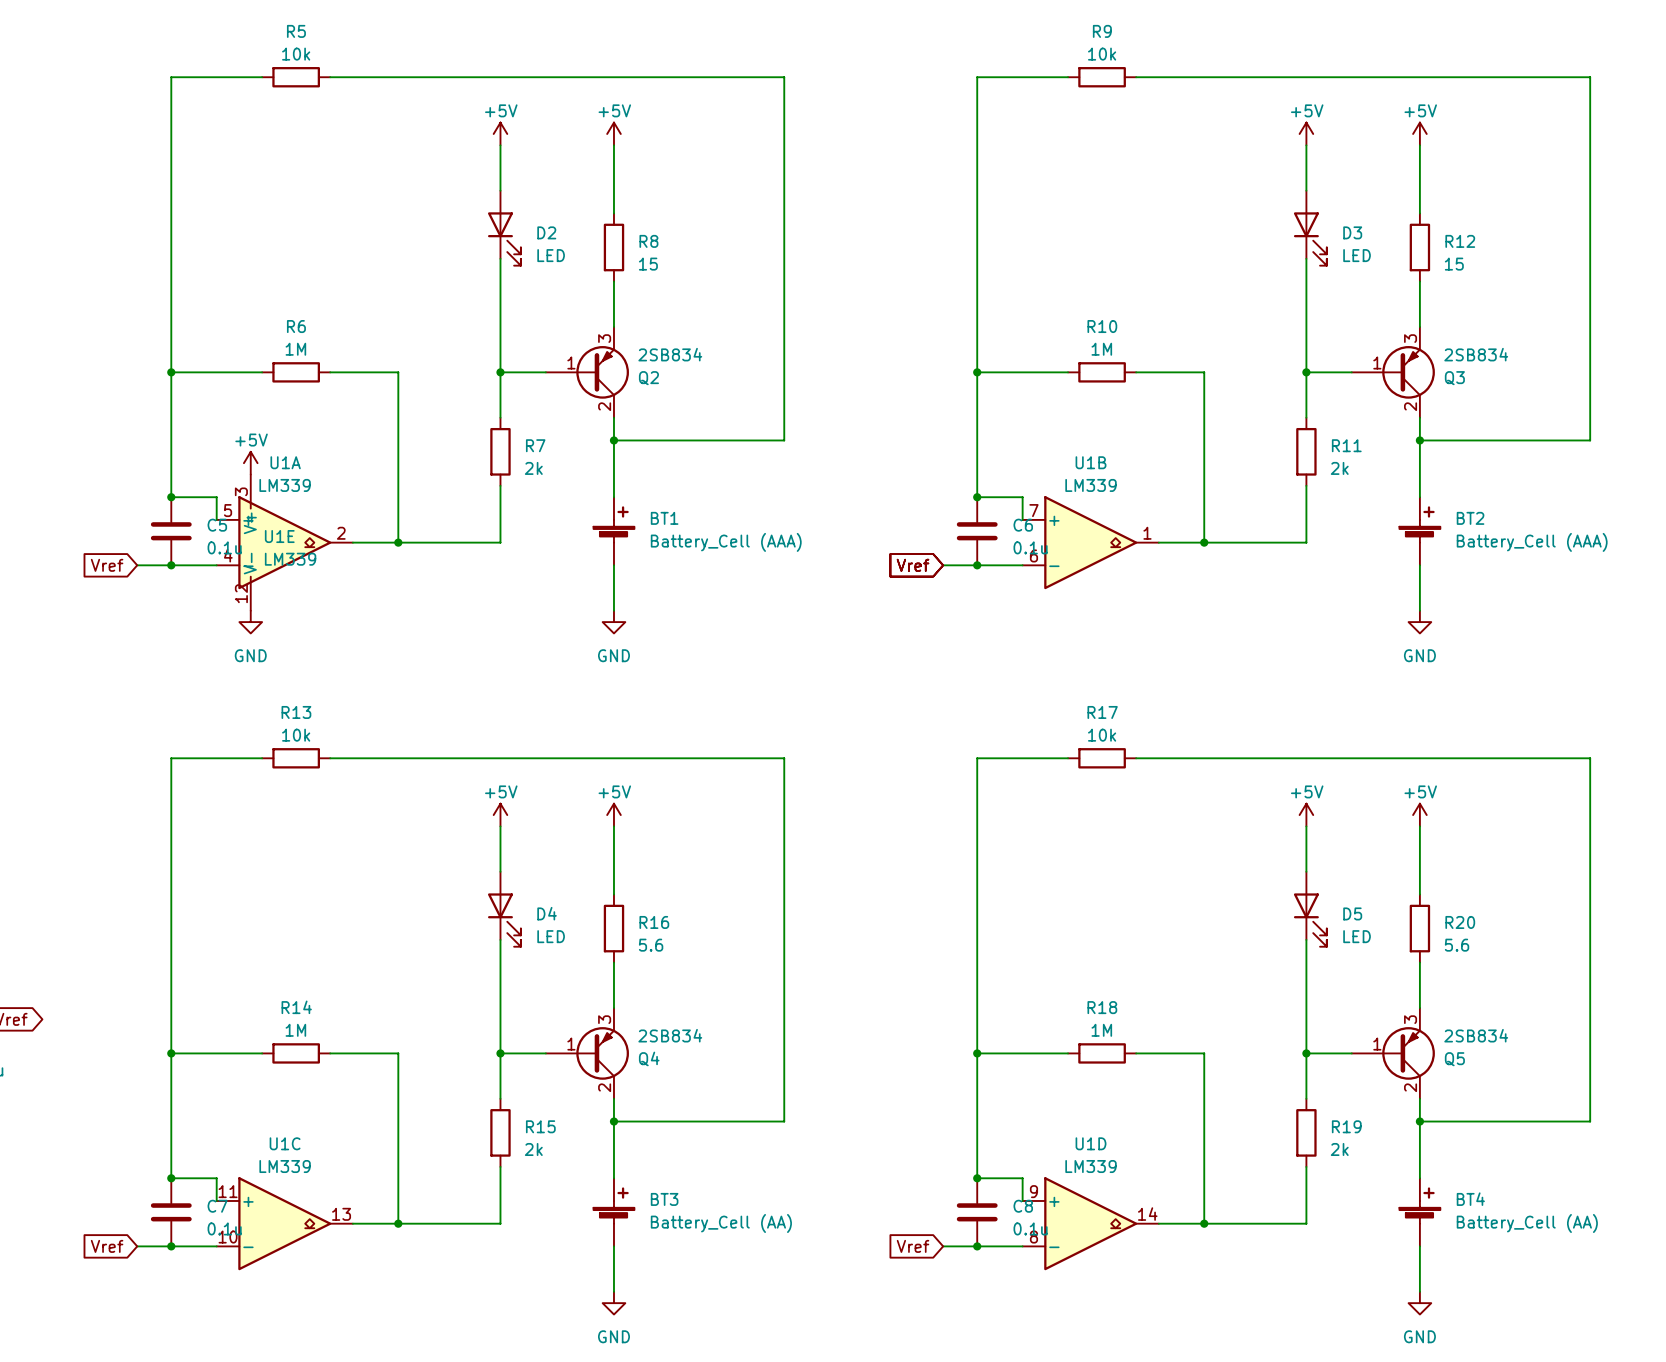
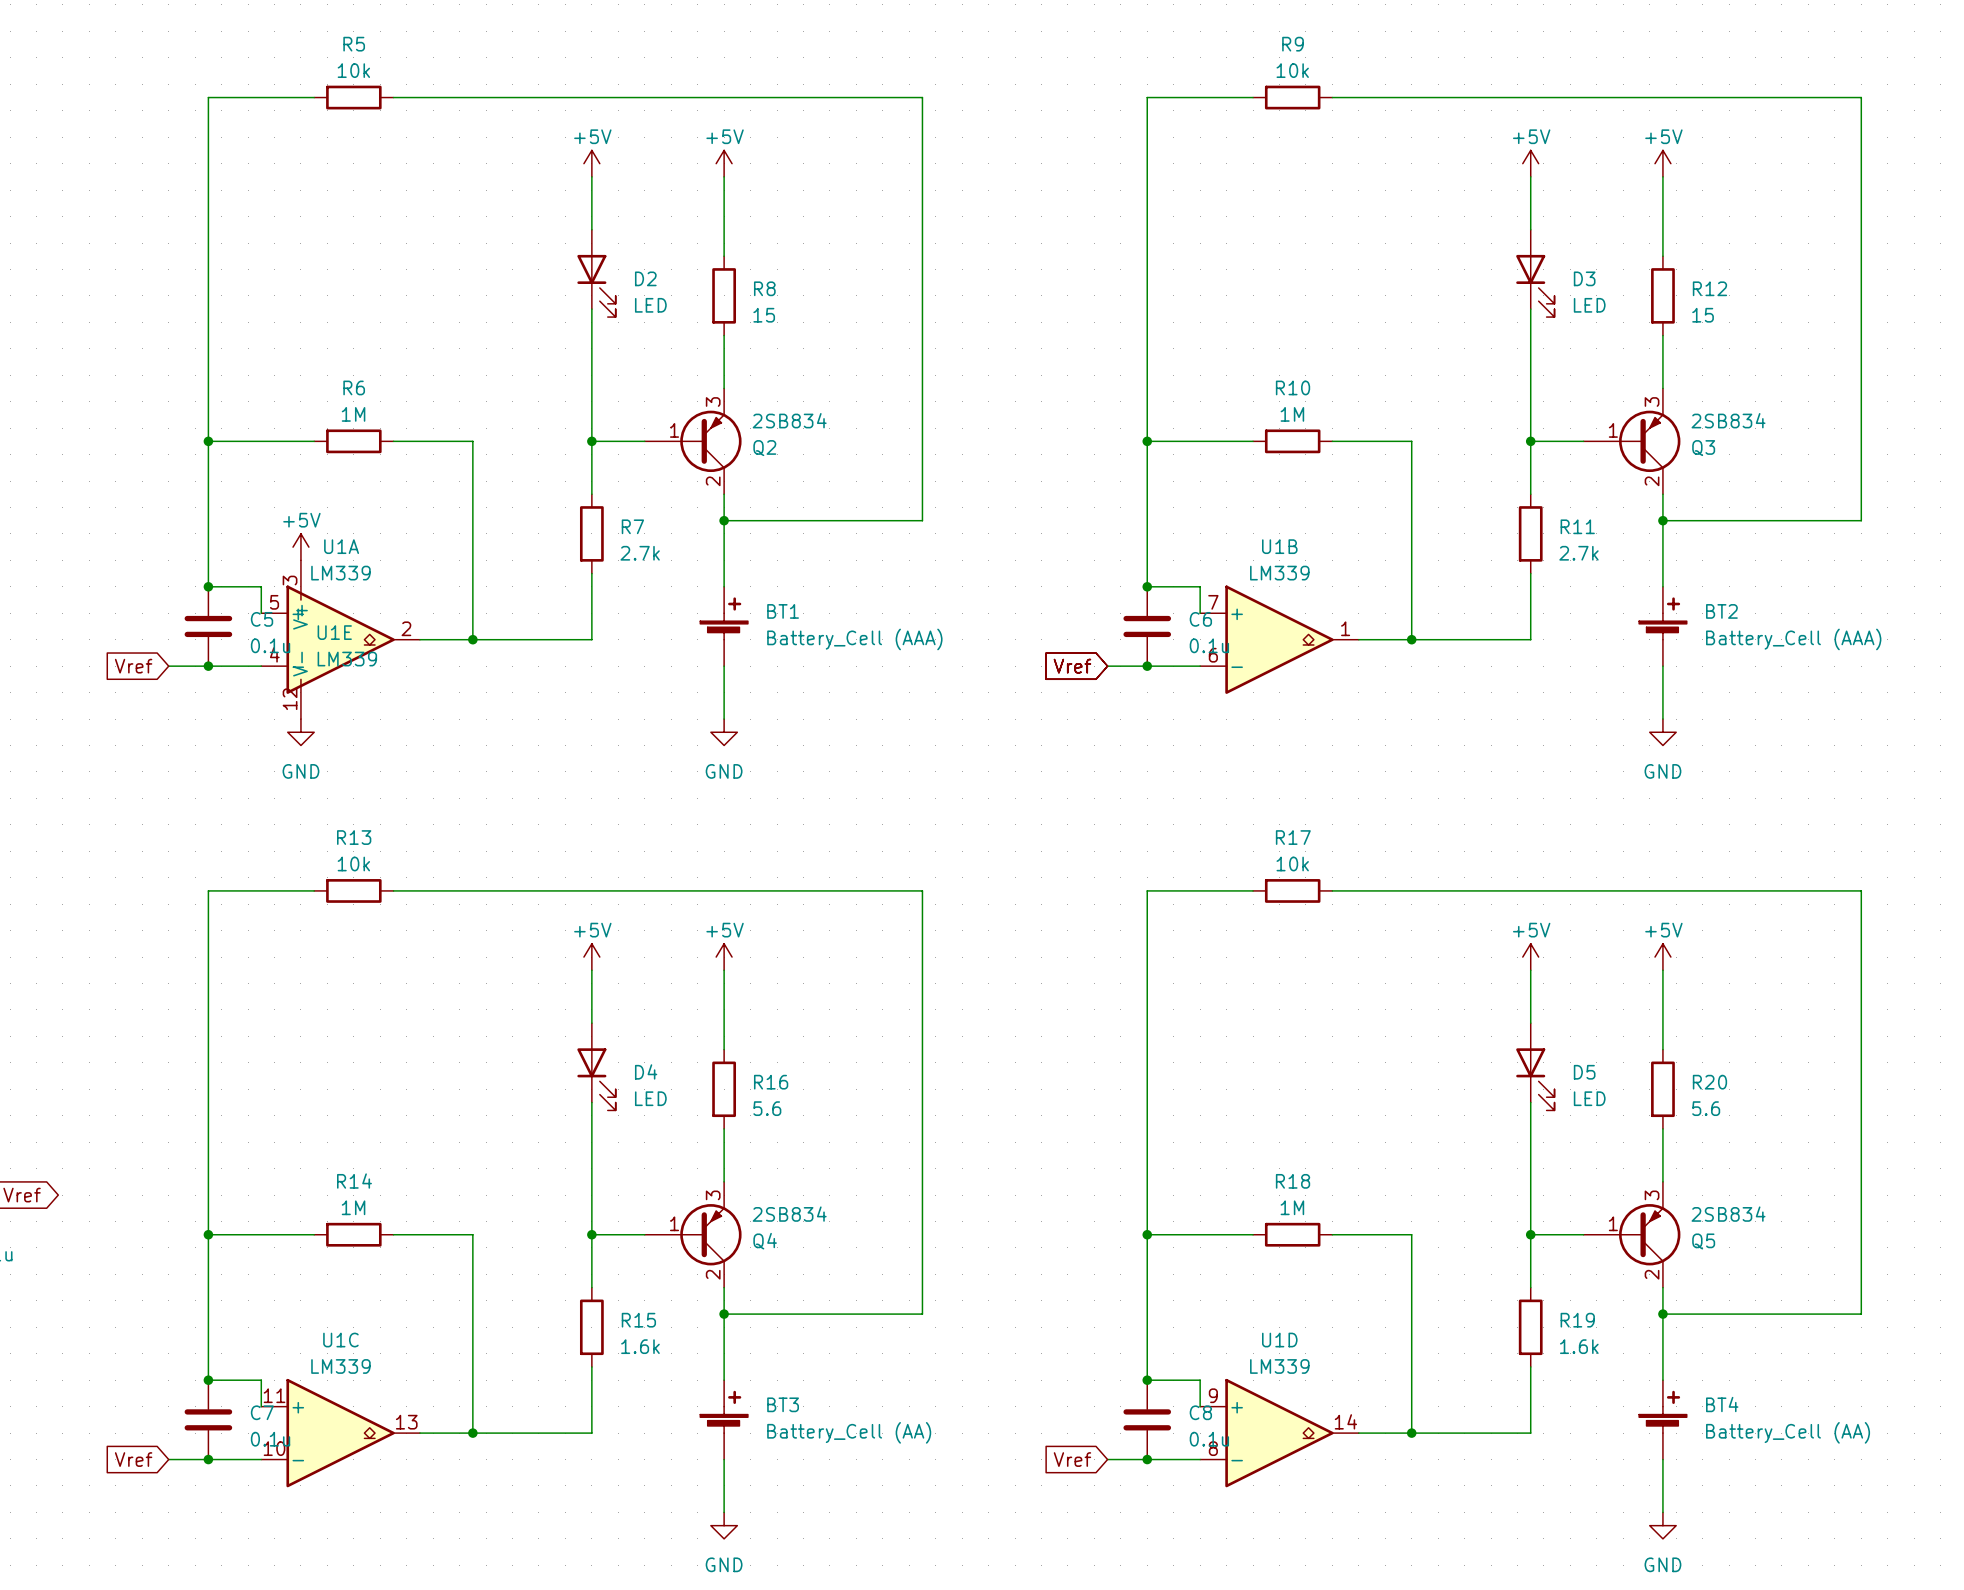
R7 value: 2k (533, 468) -> 2.7k (640, 553)
R11 value: 2k (1339, 468) -> 2.7k (1578, 553)
R15 value: 2k (533, 1149) -> 1.6k (640, 1346)
R19 value: 2k (1339, 1149) -> 1.6k (1579, 1346)

